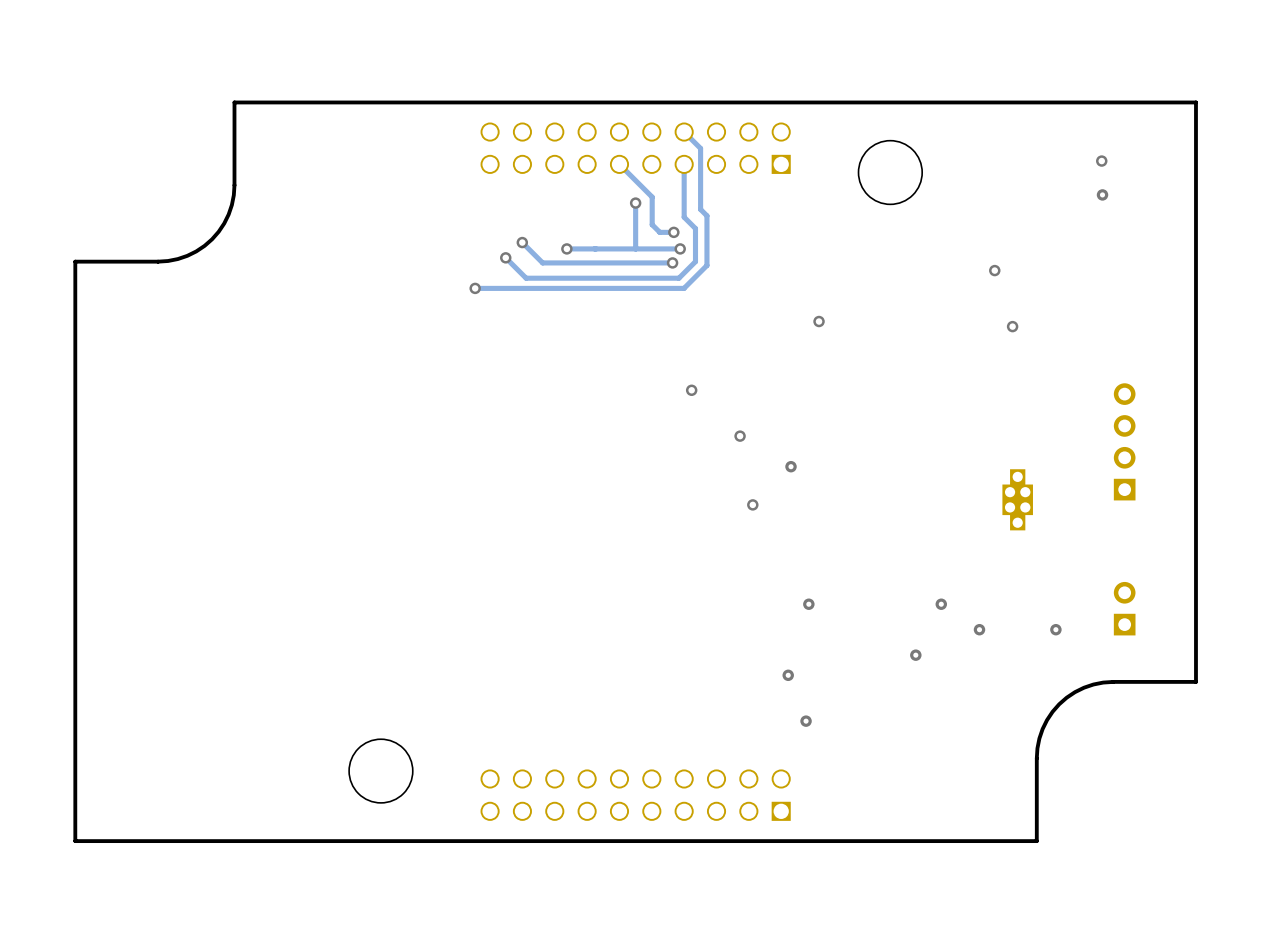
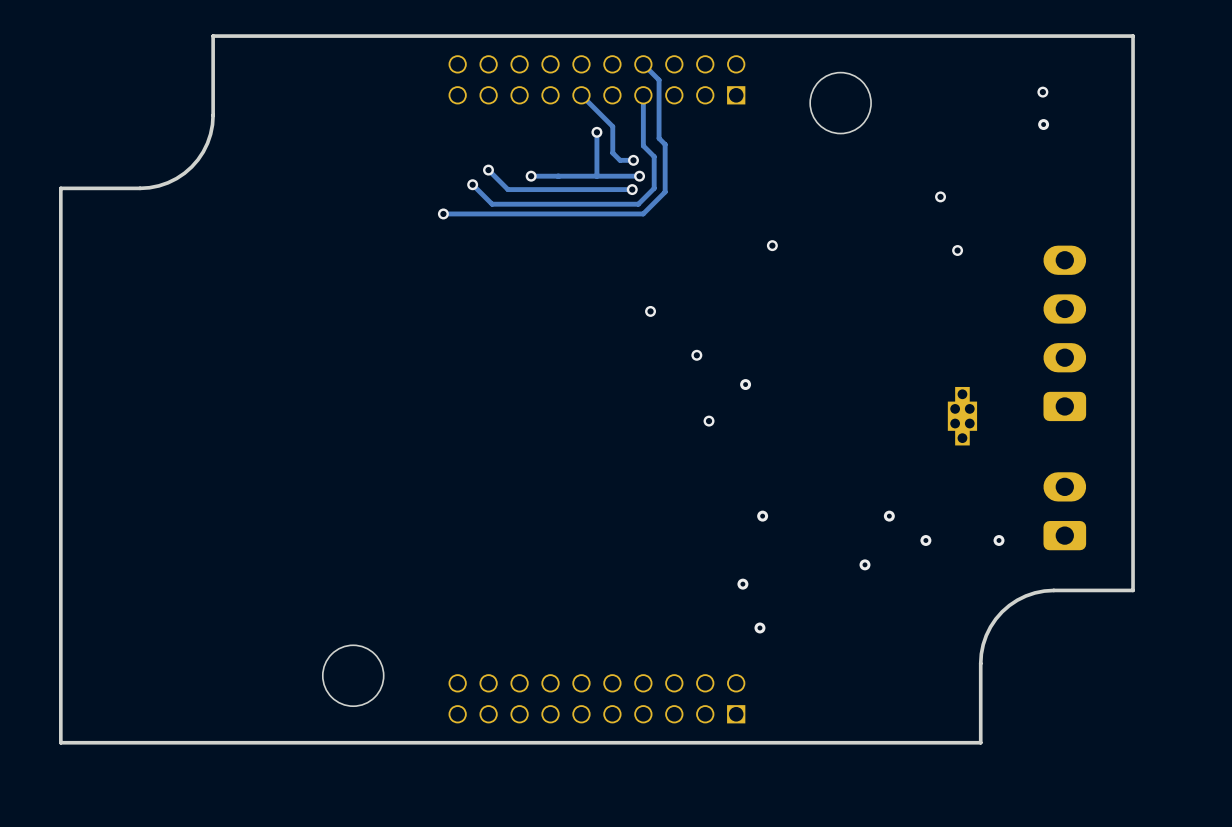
part: none -> (1064, 333)
part: (1124, 441) -> none
part footprint: [1113, 581, 1136, 636] -> [1043, 472, 1087, 551]

